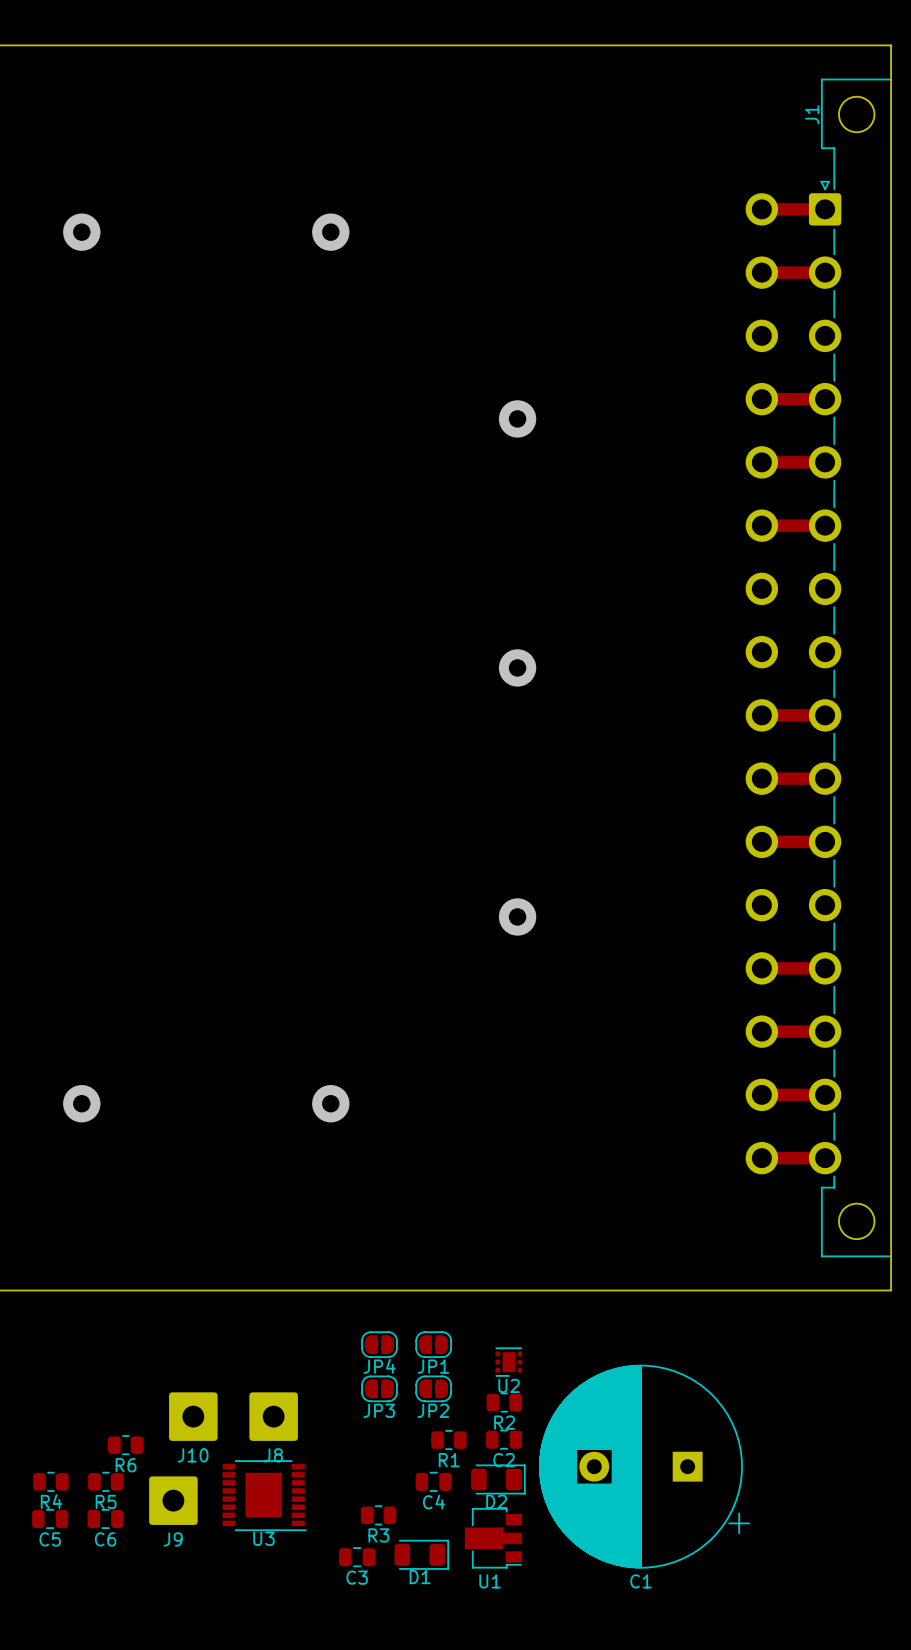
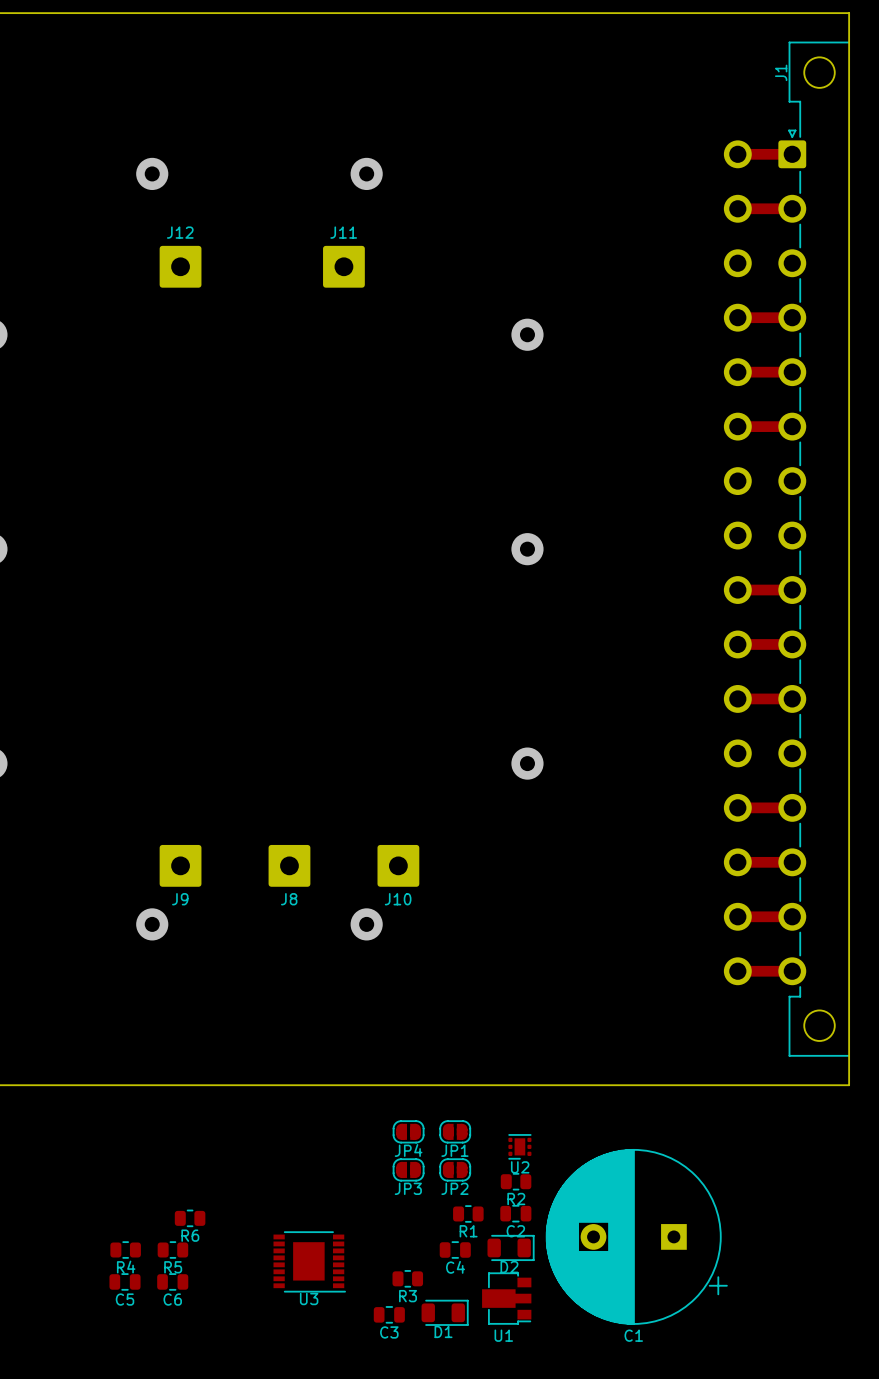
J12: none -> (180, 266)
J11: none -> (343, 266)
J10 position: (193, 1416) -> (398, 865)
J8 position: (273, 1416) -> (289, 865)
J9 position: (173, 1500) -> (180, 865)

